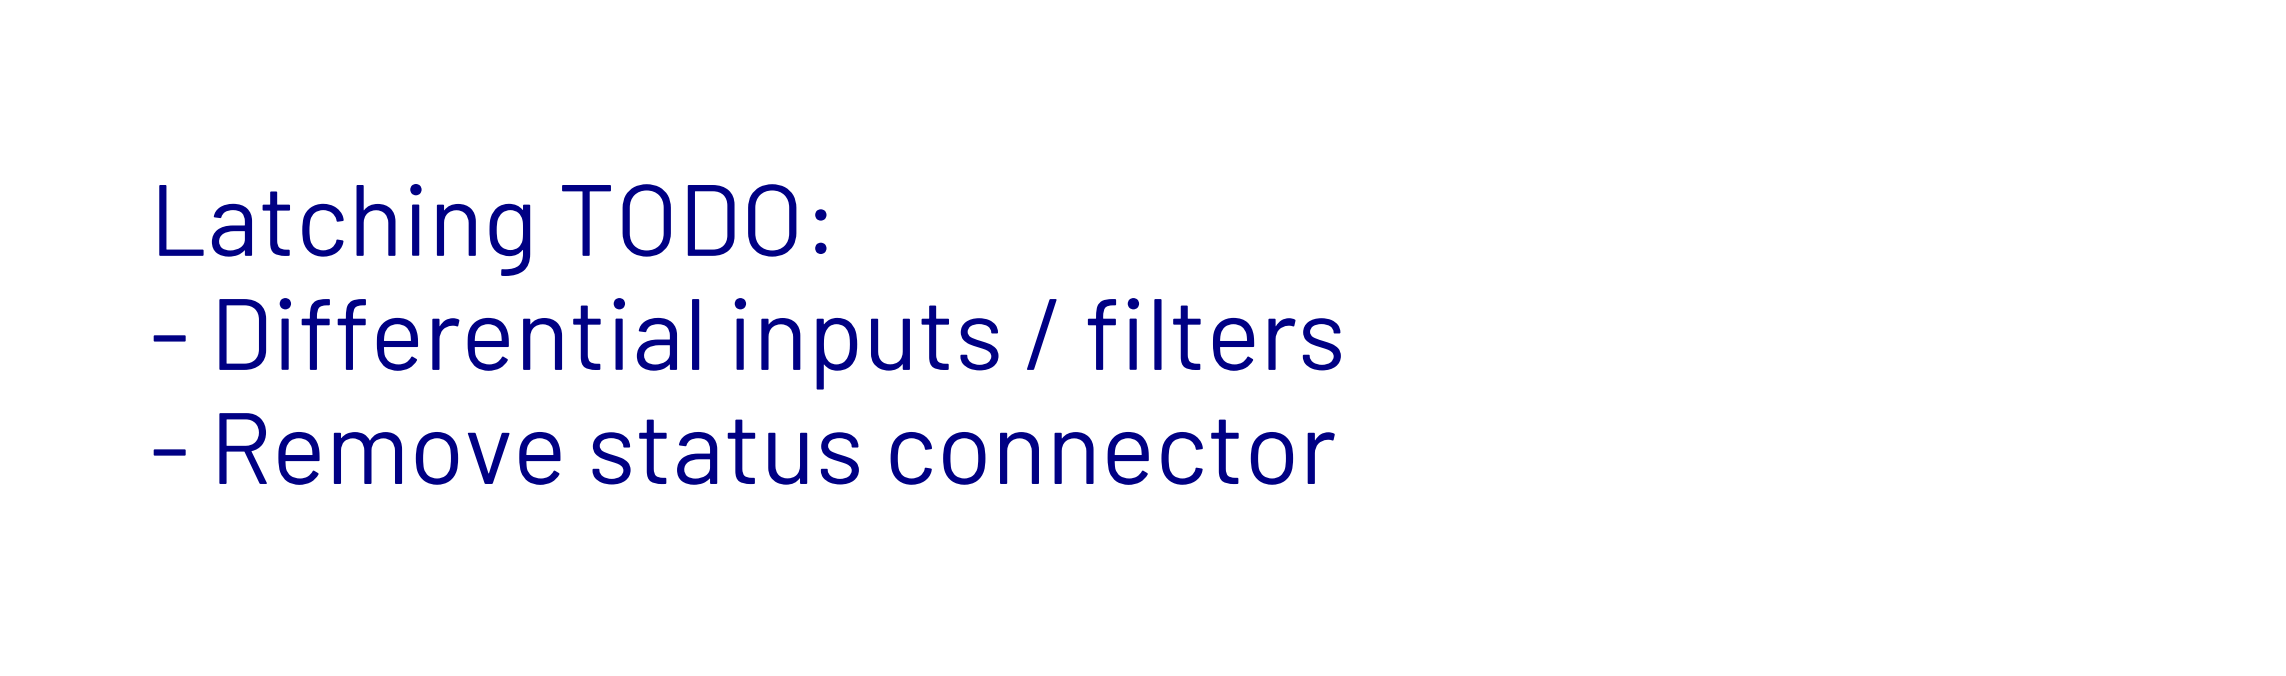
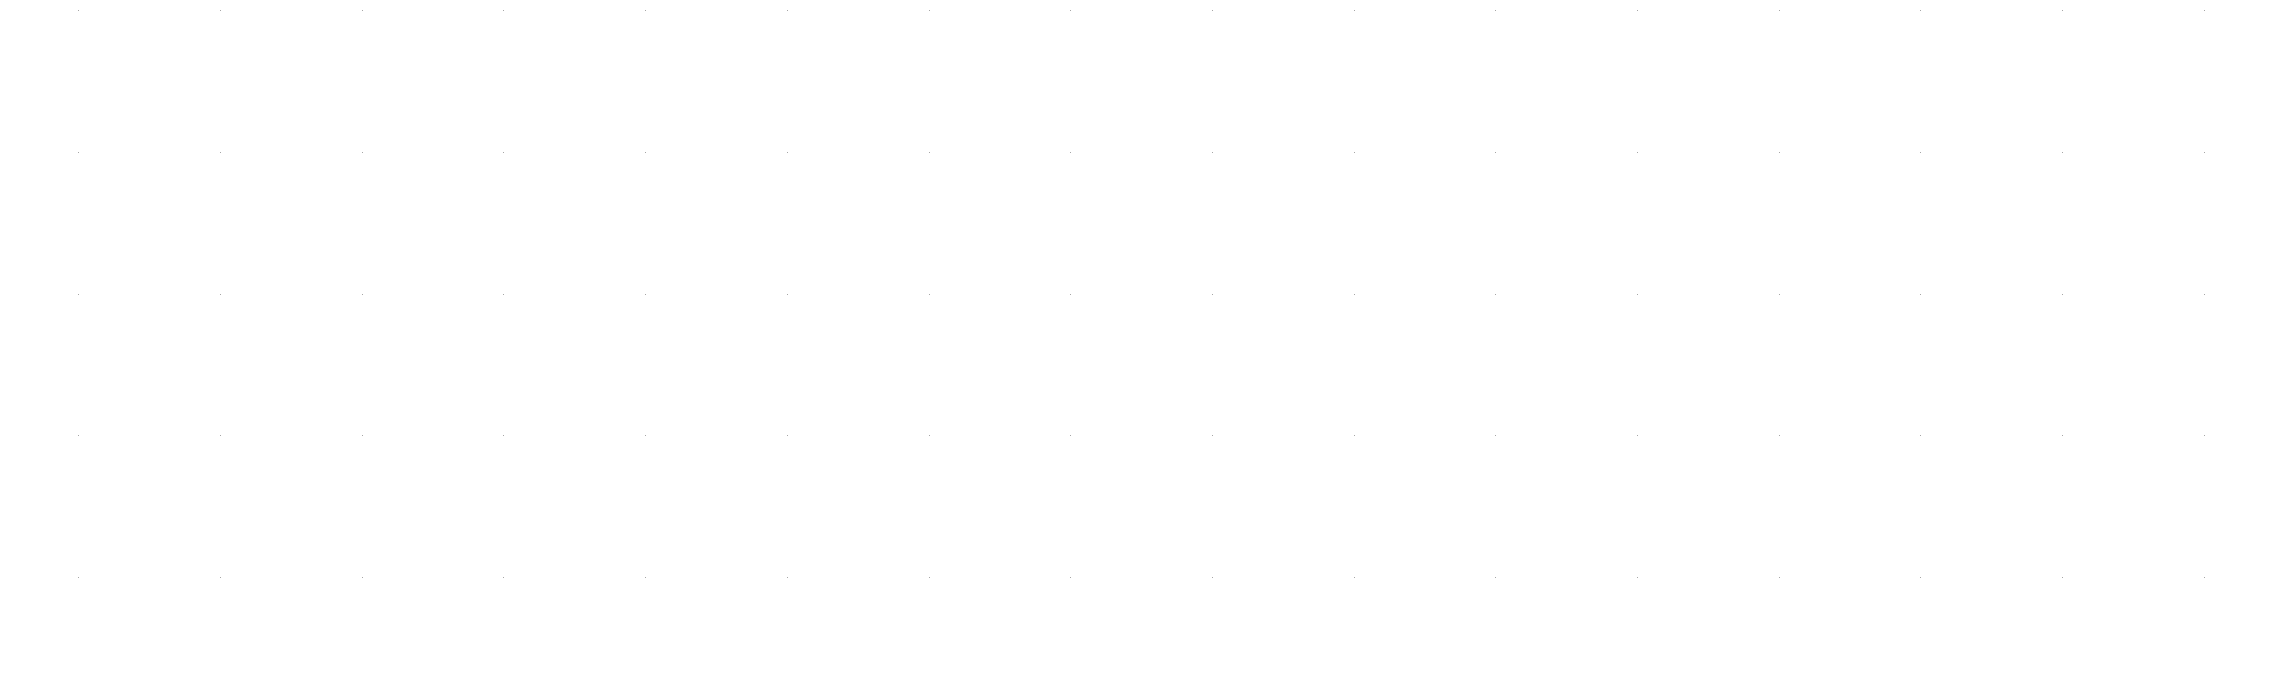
text: Latching TODO: (492, 229) -> none
text: - Differential inputs / filters (747, 343) -> none
text: - Remove status connector (744, 449) -> none

